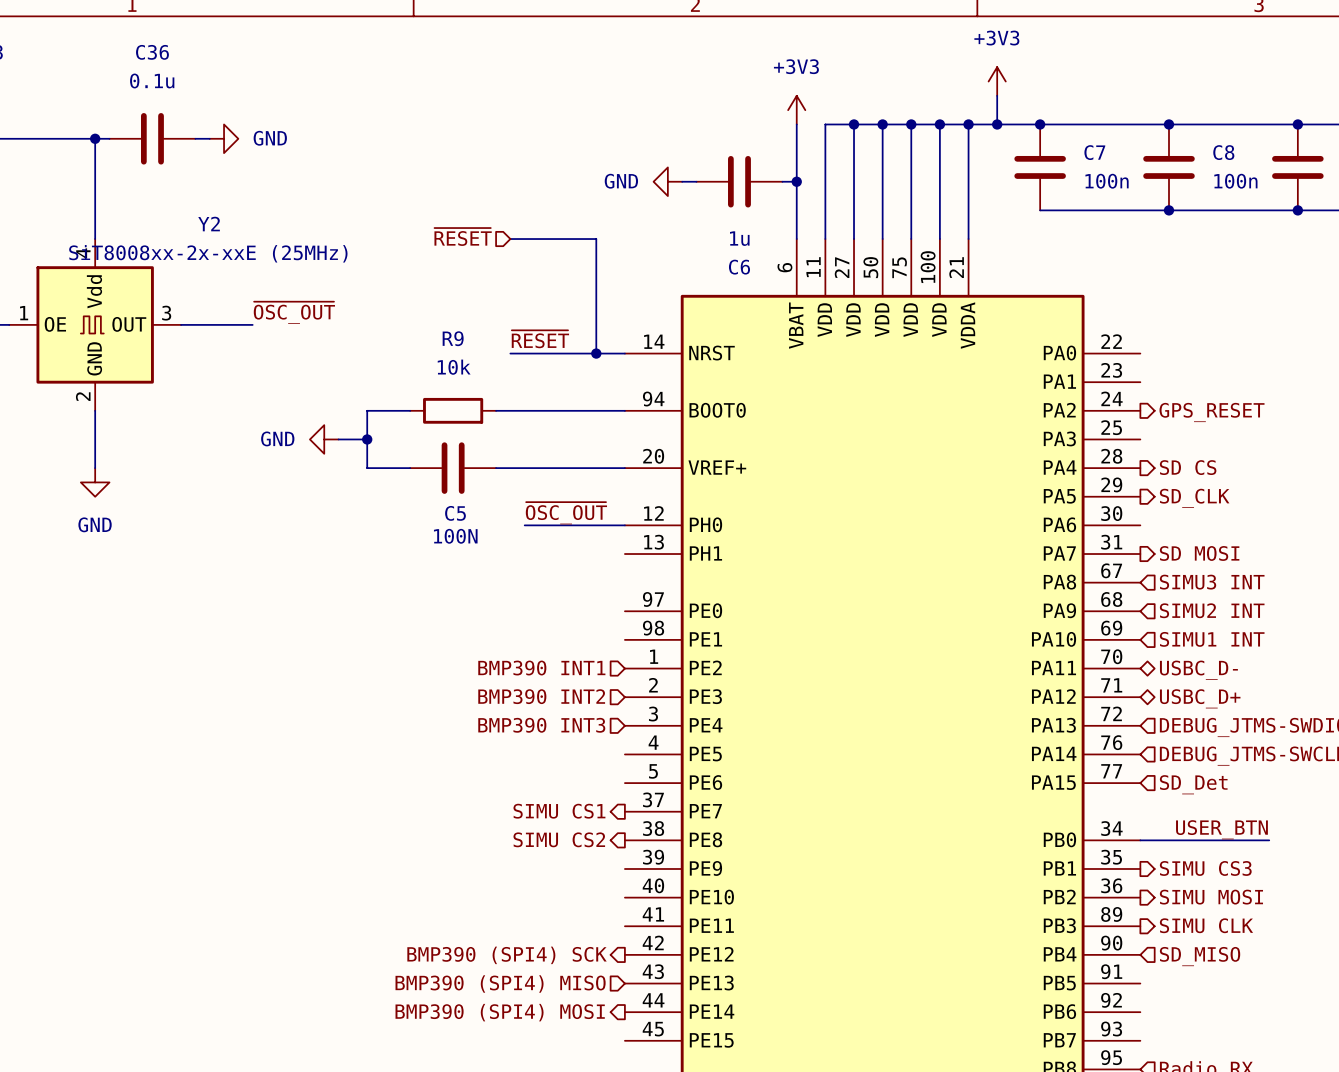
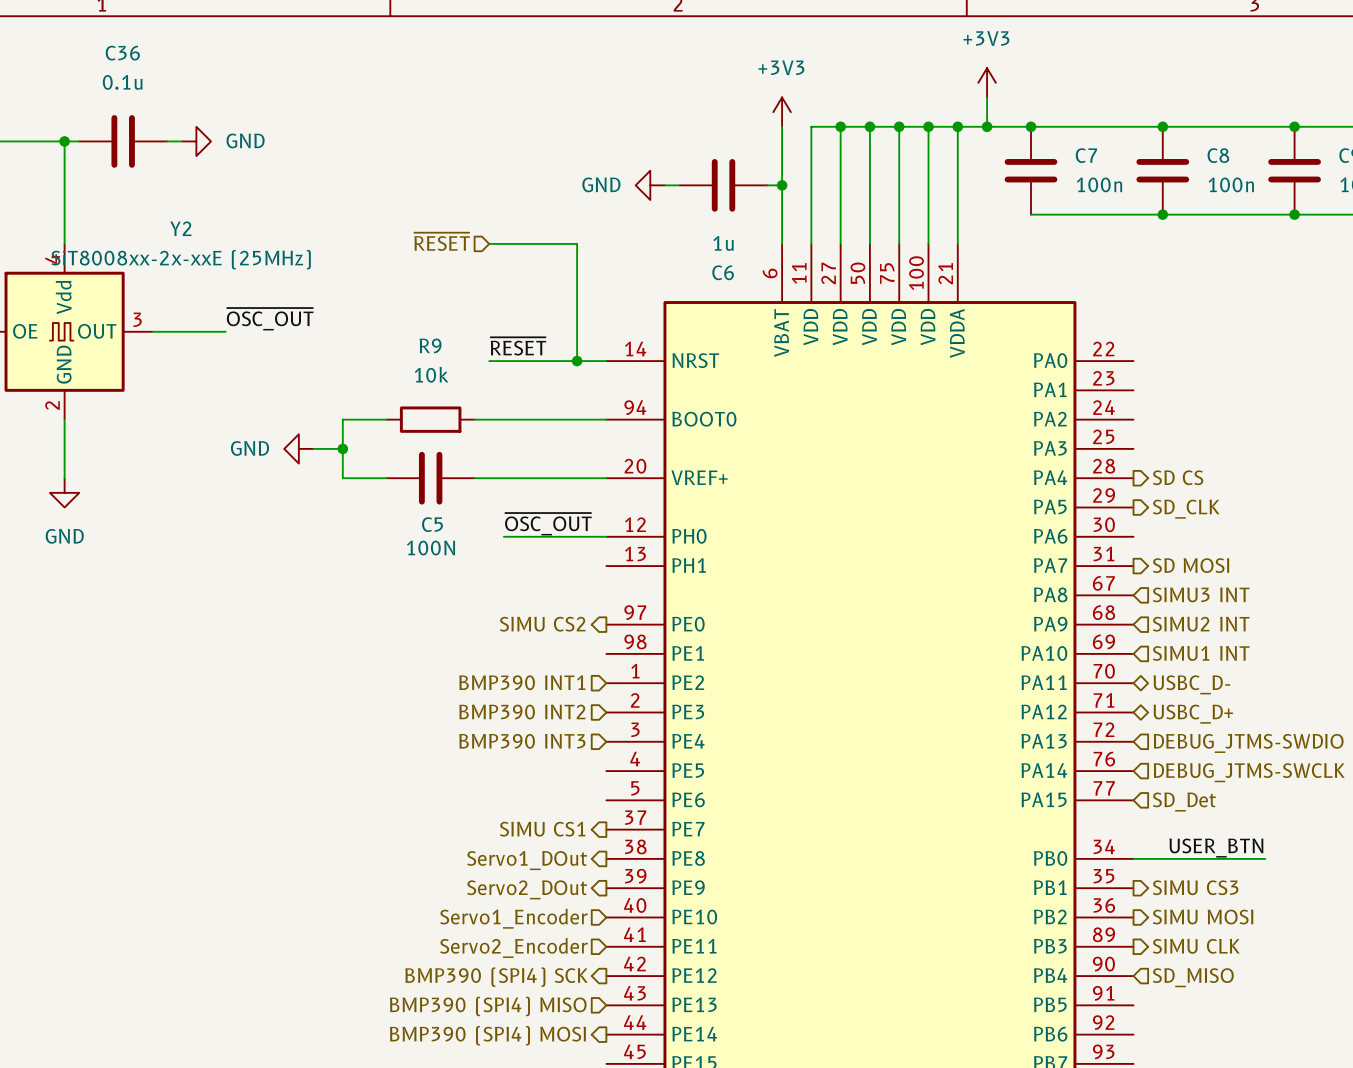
hierarchical label: GPS_RESET (1212, 412) -> none
hierarchical label: none -> SIMU CS2 (542, 624)
hierarchical label: SIMU CS2 (559, 839) -> Servo1_DOut (527, 860)
hierarchical label: none -> Servo2_DOut (527, 889)
hierarchical label: none -> Servo1_Encoder (513, 918)
hierarchical label: none -> Servo2_Encoder (513, 947)

